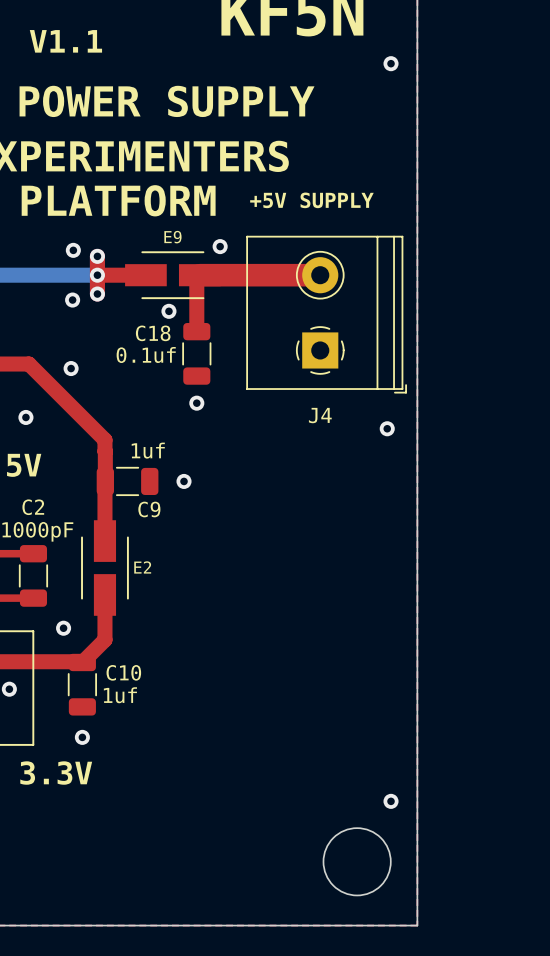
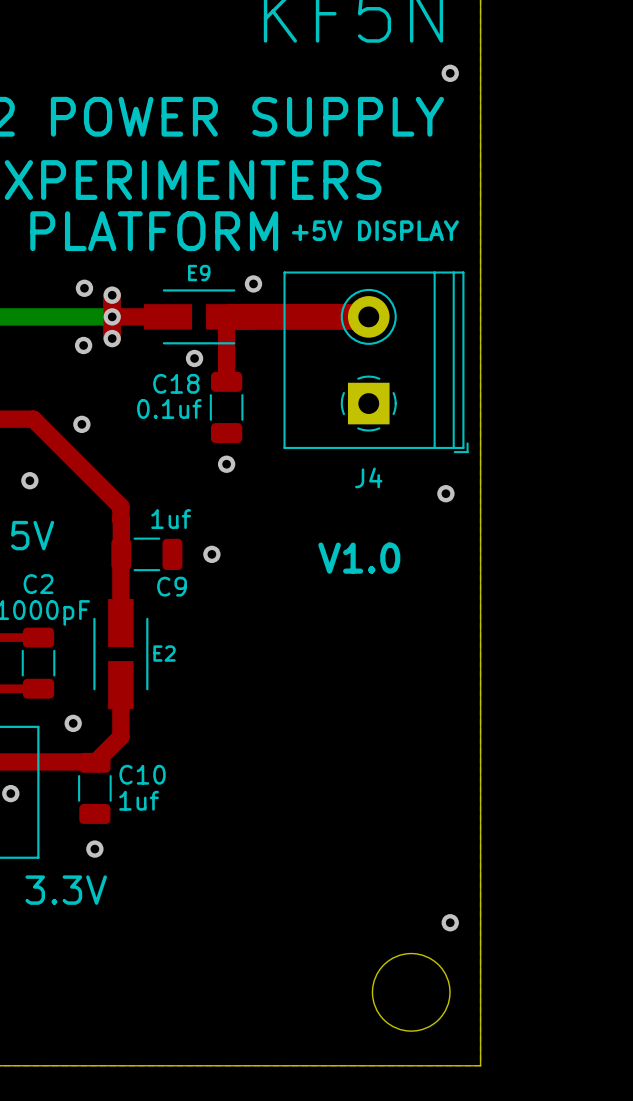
text: V1.1 (65, 41) -> none
text: +5V SUPPLY (311, 200) -> +5V DISPLAY (375, 230)
text: none -> V1.0 (359, 558)

